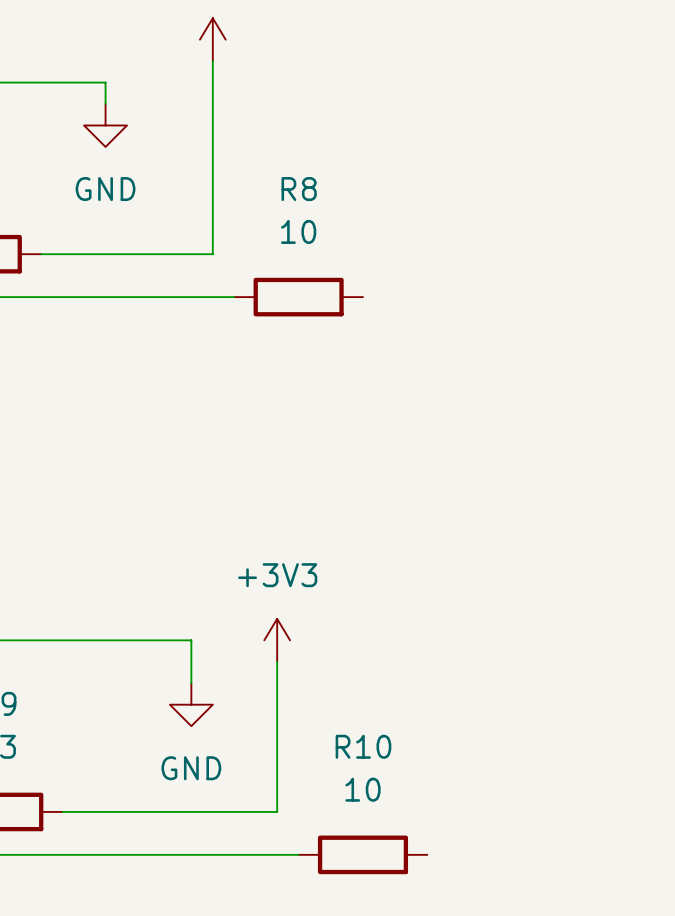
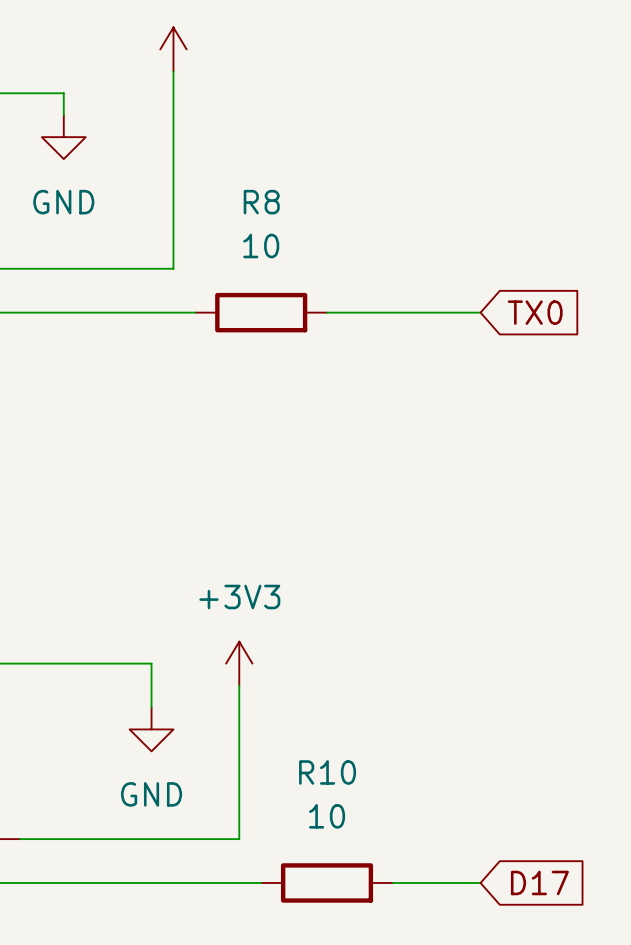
wire: none -> (327, 312) (480, 312)
global label: none -> TX0 (535, 312)
wire: none -> (392, 882) (480, 882)
global label: none -> D17 (539, 882)

